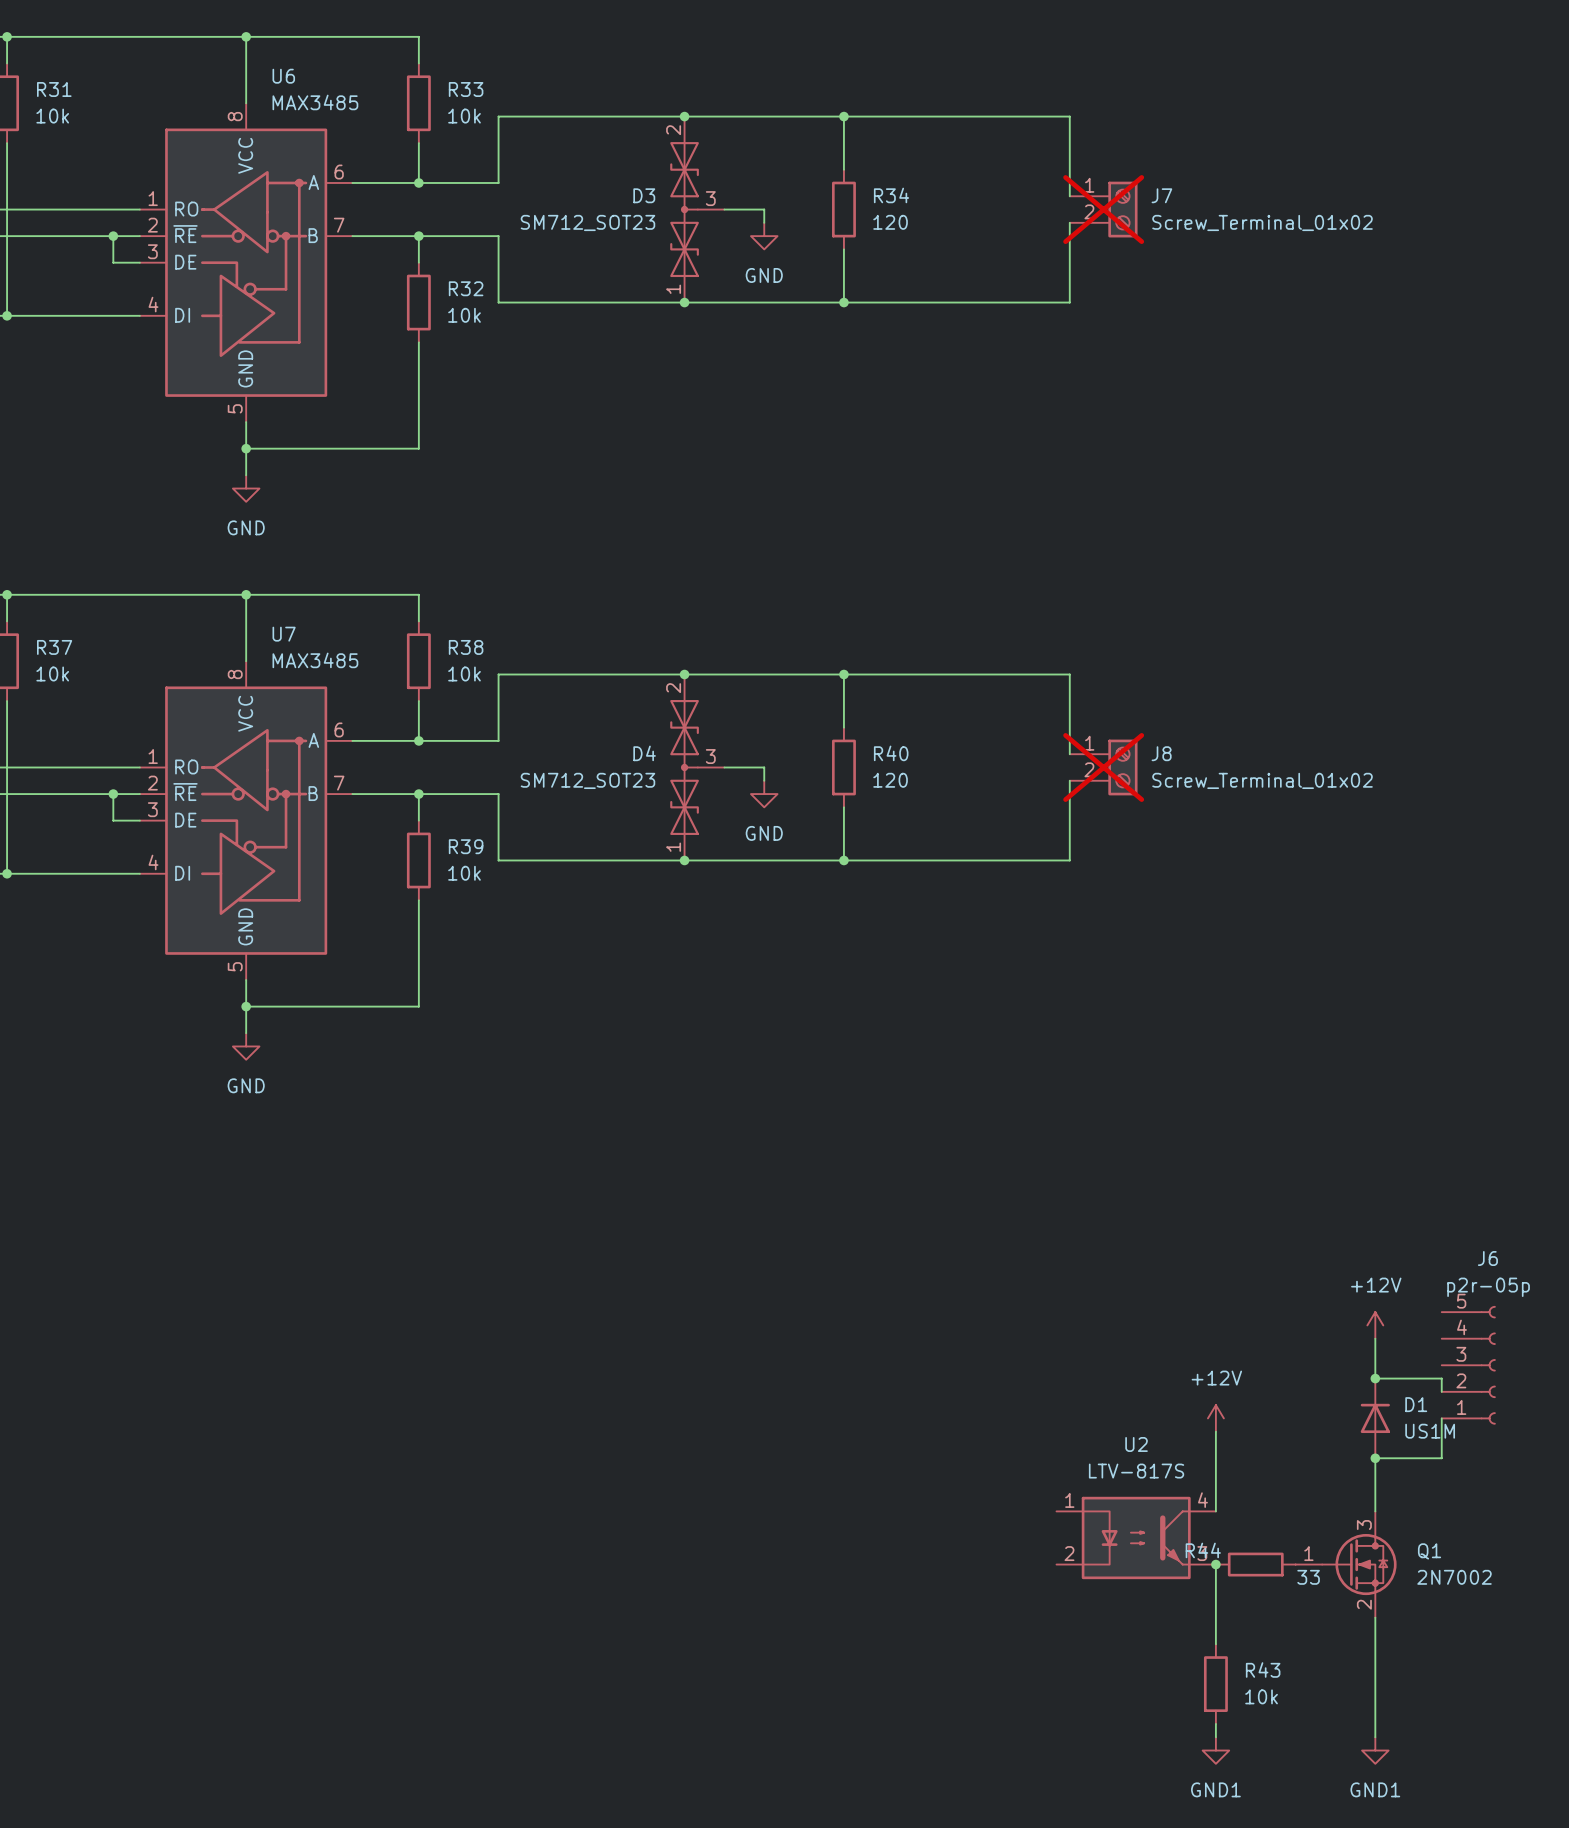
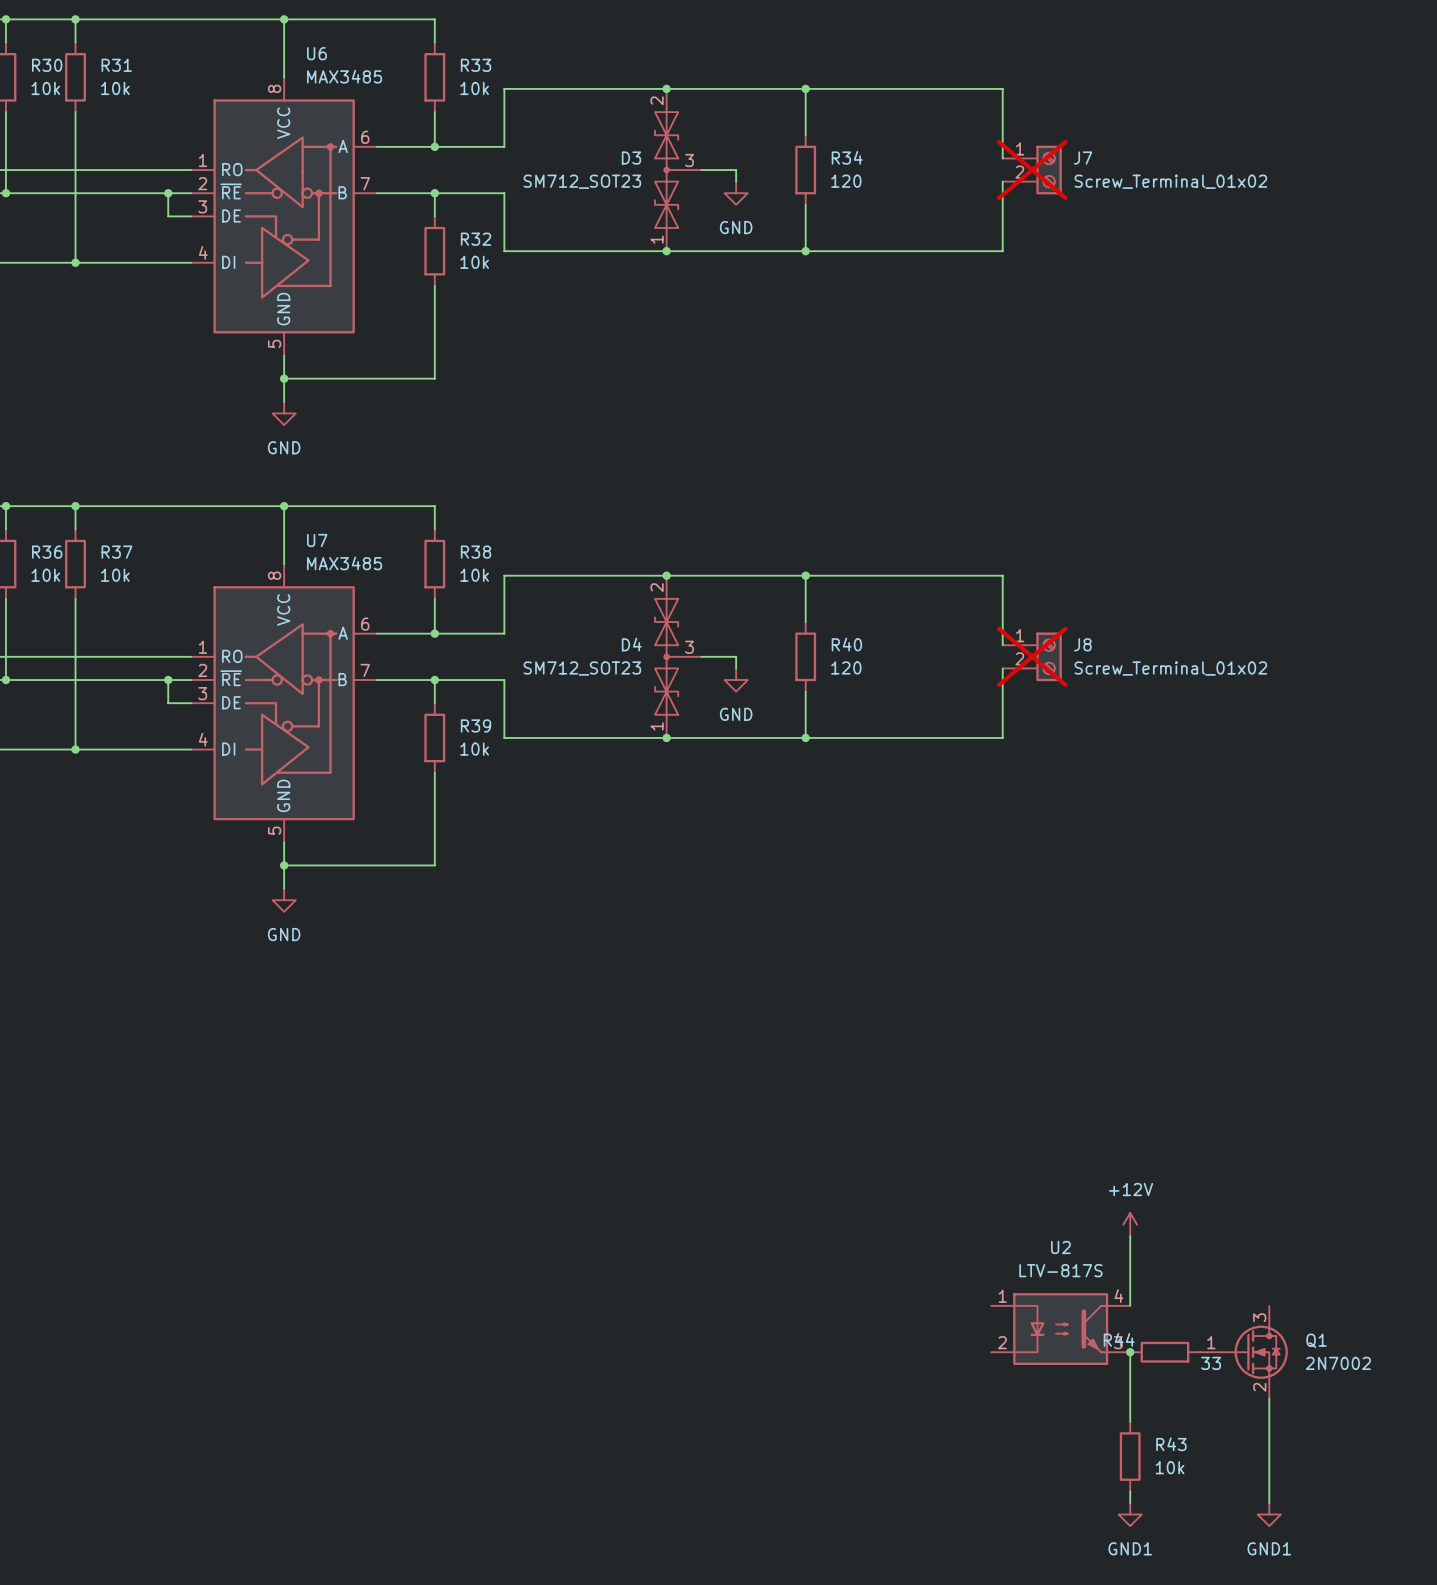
power symbol: +12V (1375, 1325) -> none
wire: (1375, 1338) (1375, 1378) (1441, 1378) (1441, 1391) -> none
J6: p2r-05p (1468, 1365) -> none
junction: (1375, 1378) -> none
D1: US1M (1375, 1418) -> none
wire: (1441, 1418) (1441, 1458) (1375, 1458) (1375, 1511) -> none
junction: (1375, 1458) -> none

